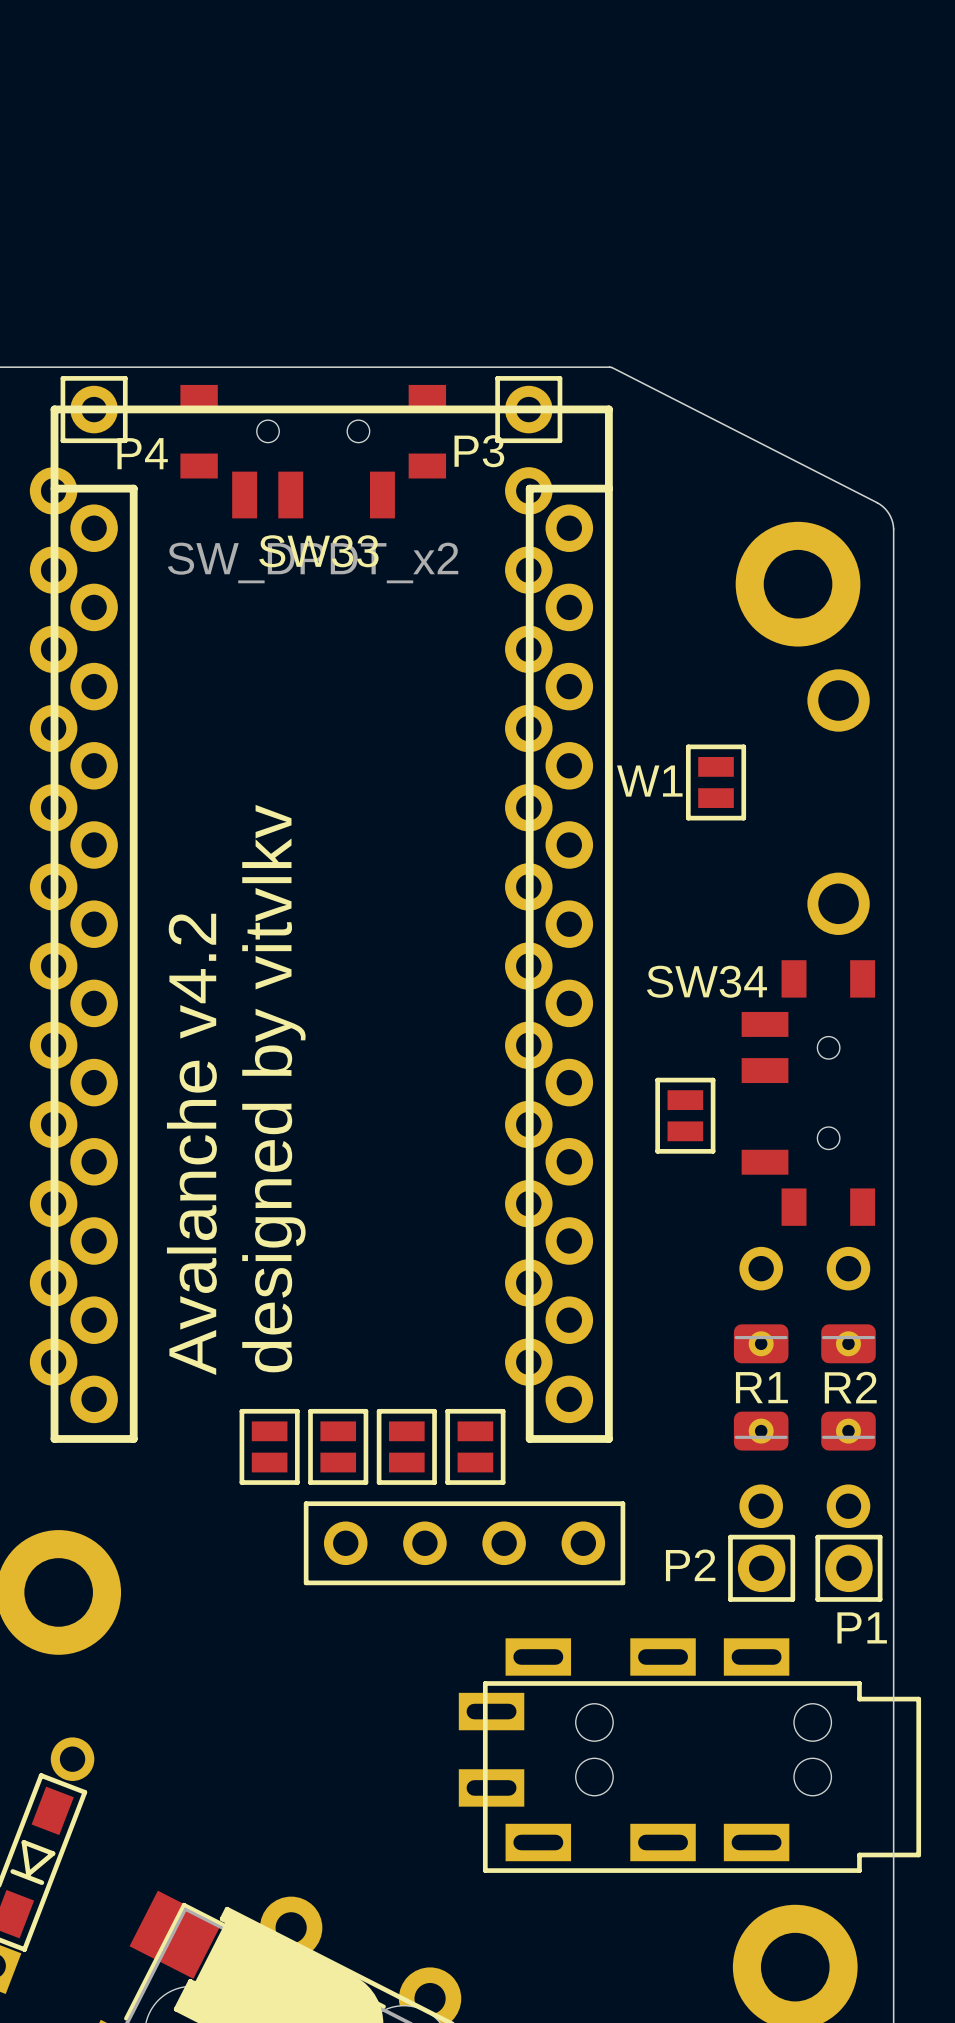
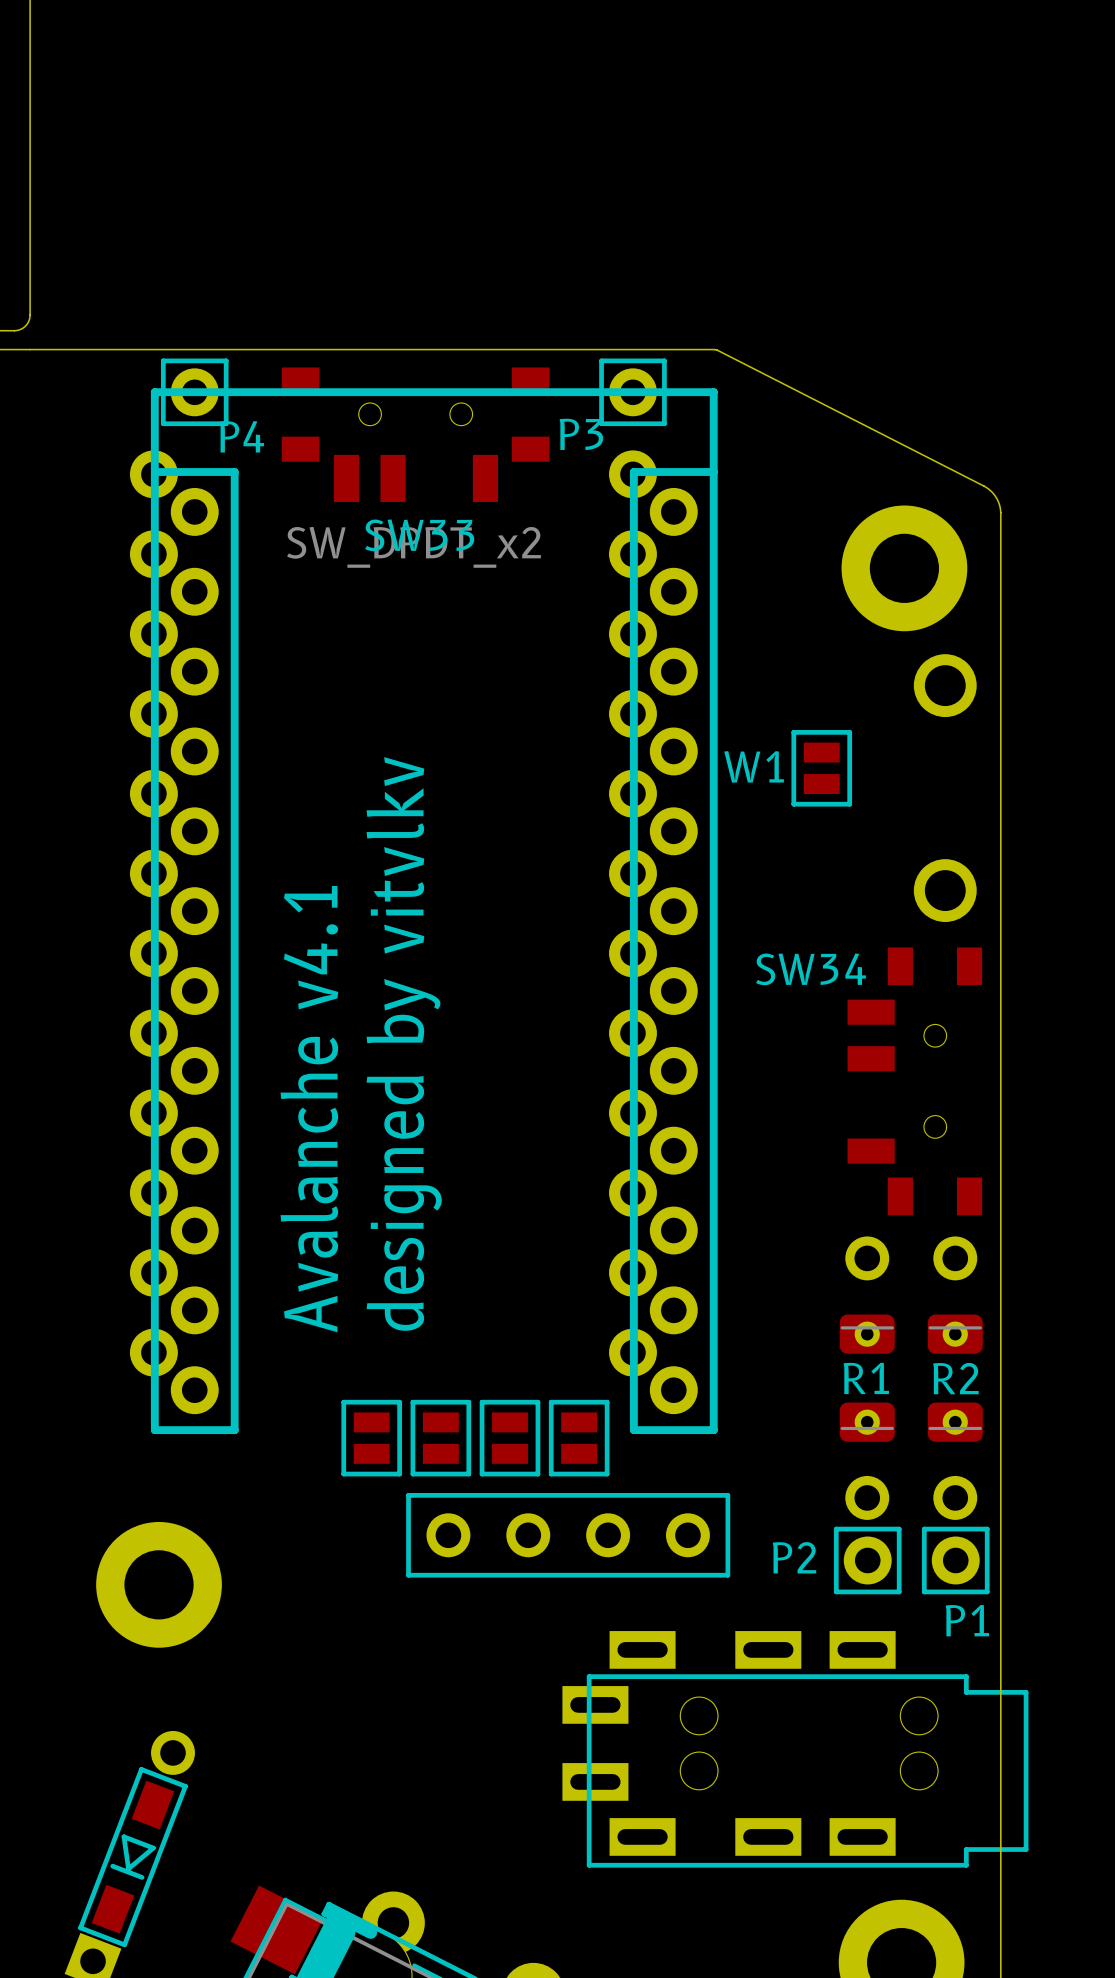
text position: designed by vitvlkv (273, 1088) -> designed by vitvlkv (404, 1043)
part: (685, 1115) -> none
text: Avalanche v4.2 (191, 1144) -> Avalanche v4.1 (309, 1109)

